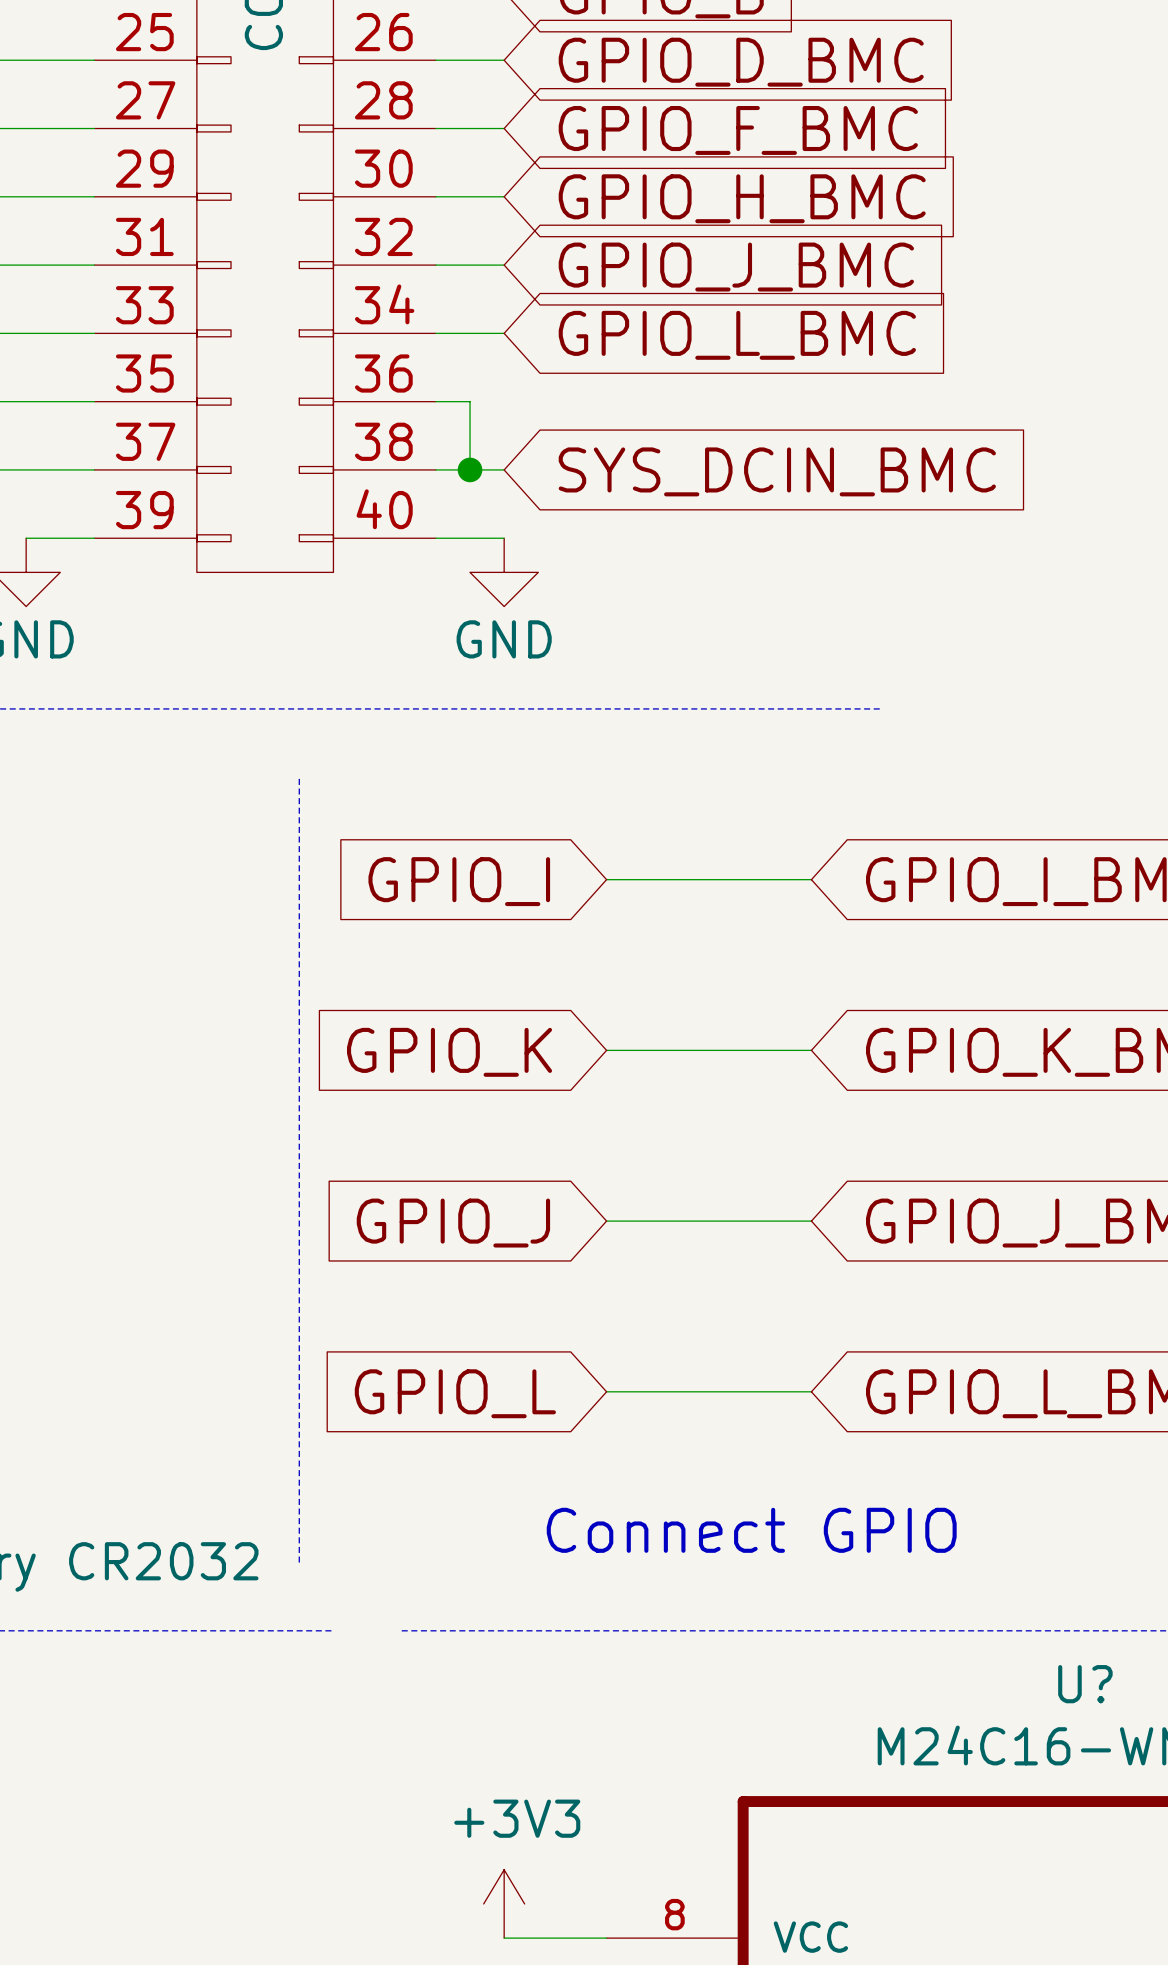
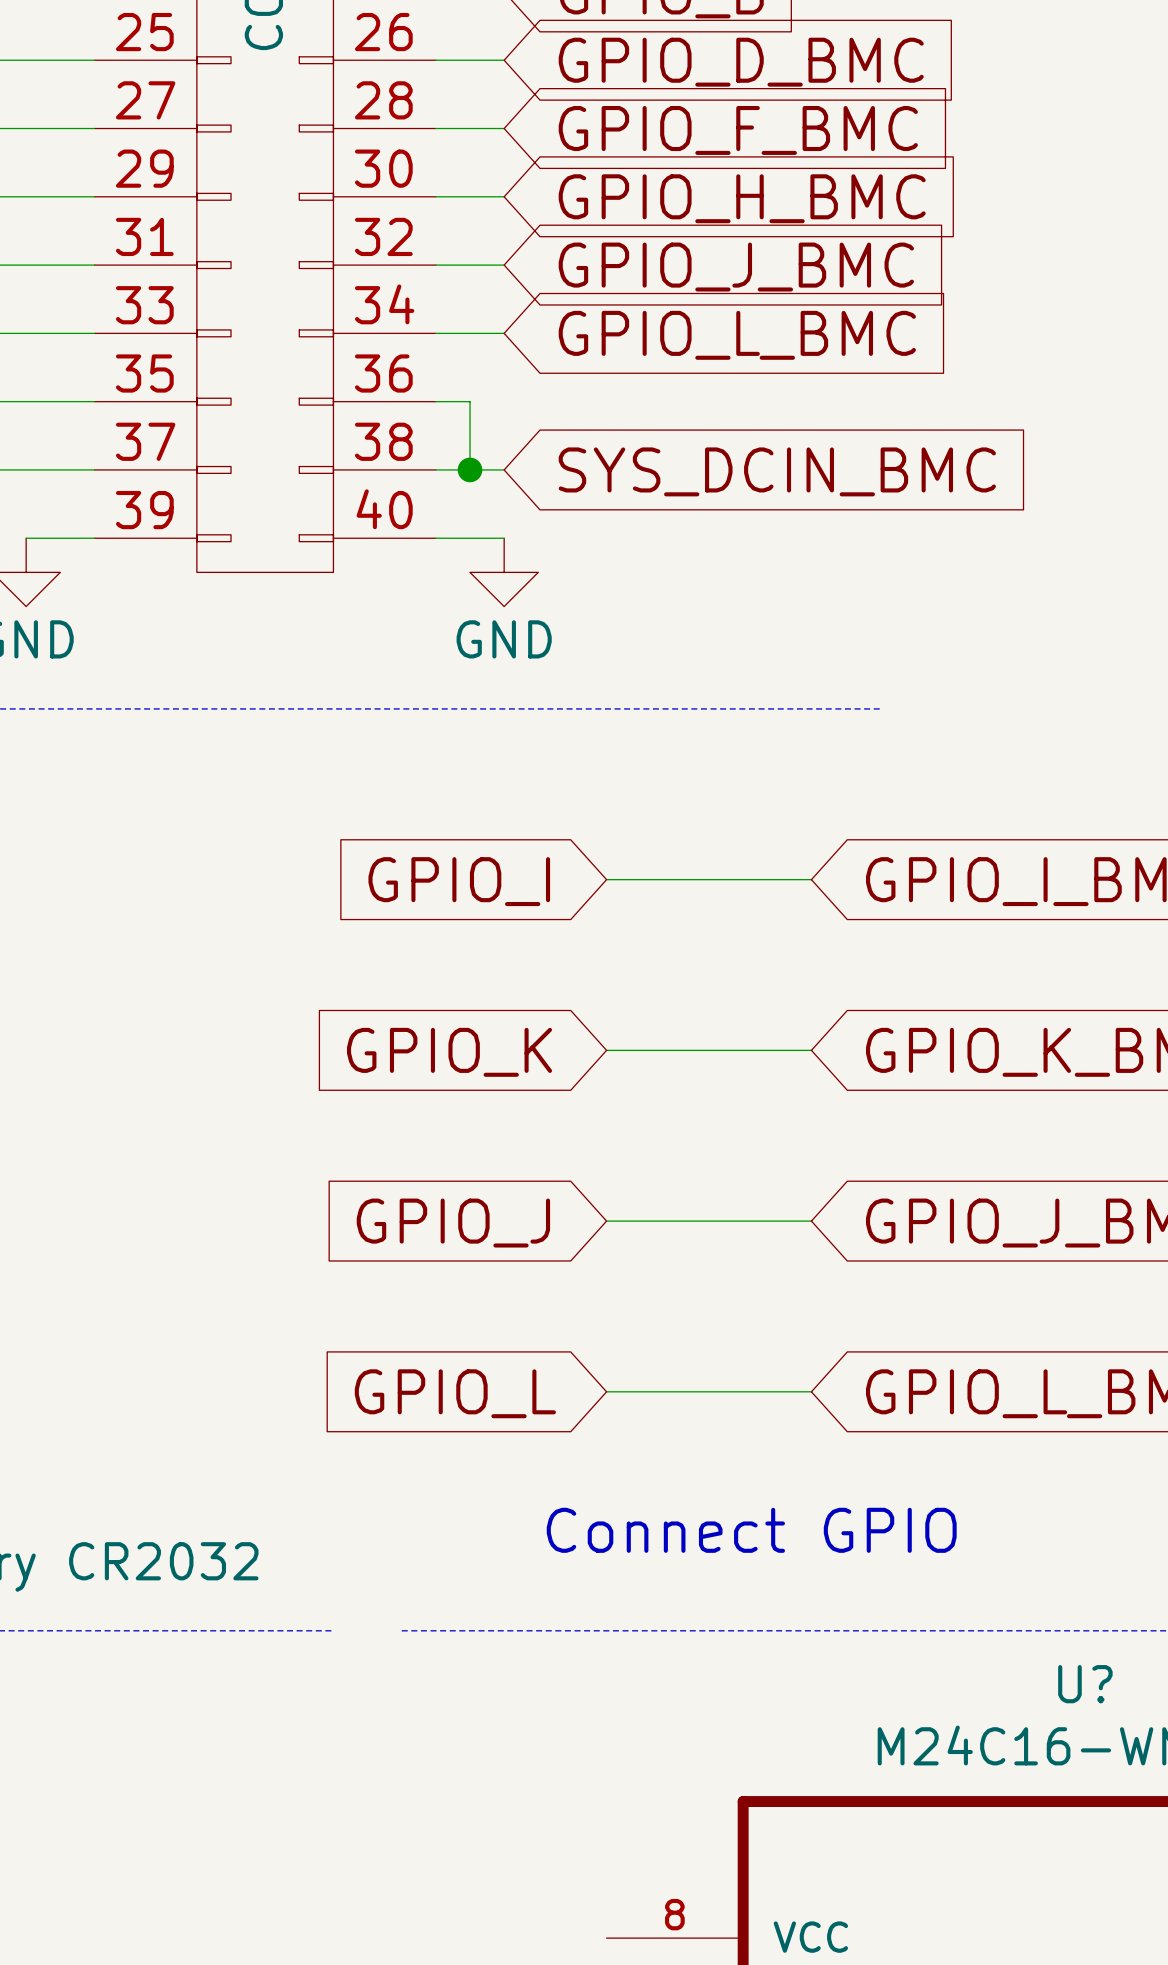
line: (299, 777) (299, 1562) -> none
power symbol: +3V3 (504, 1903) -> none
wire: (504, 1938) (606, 1938) -> none

